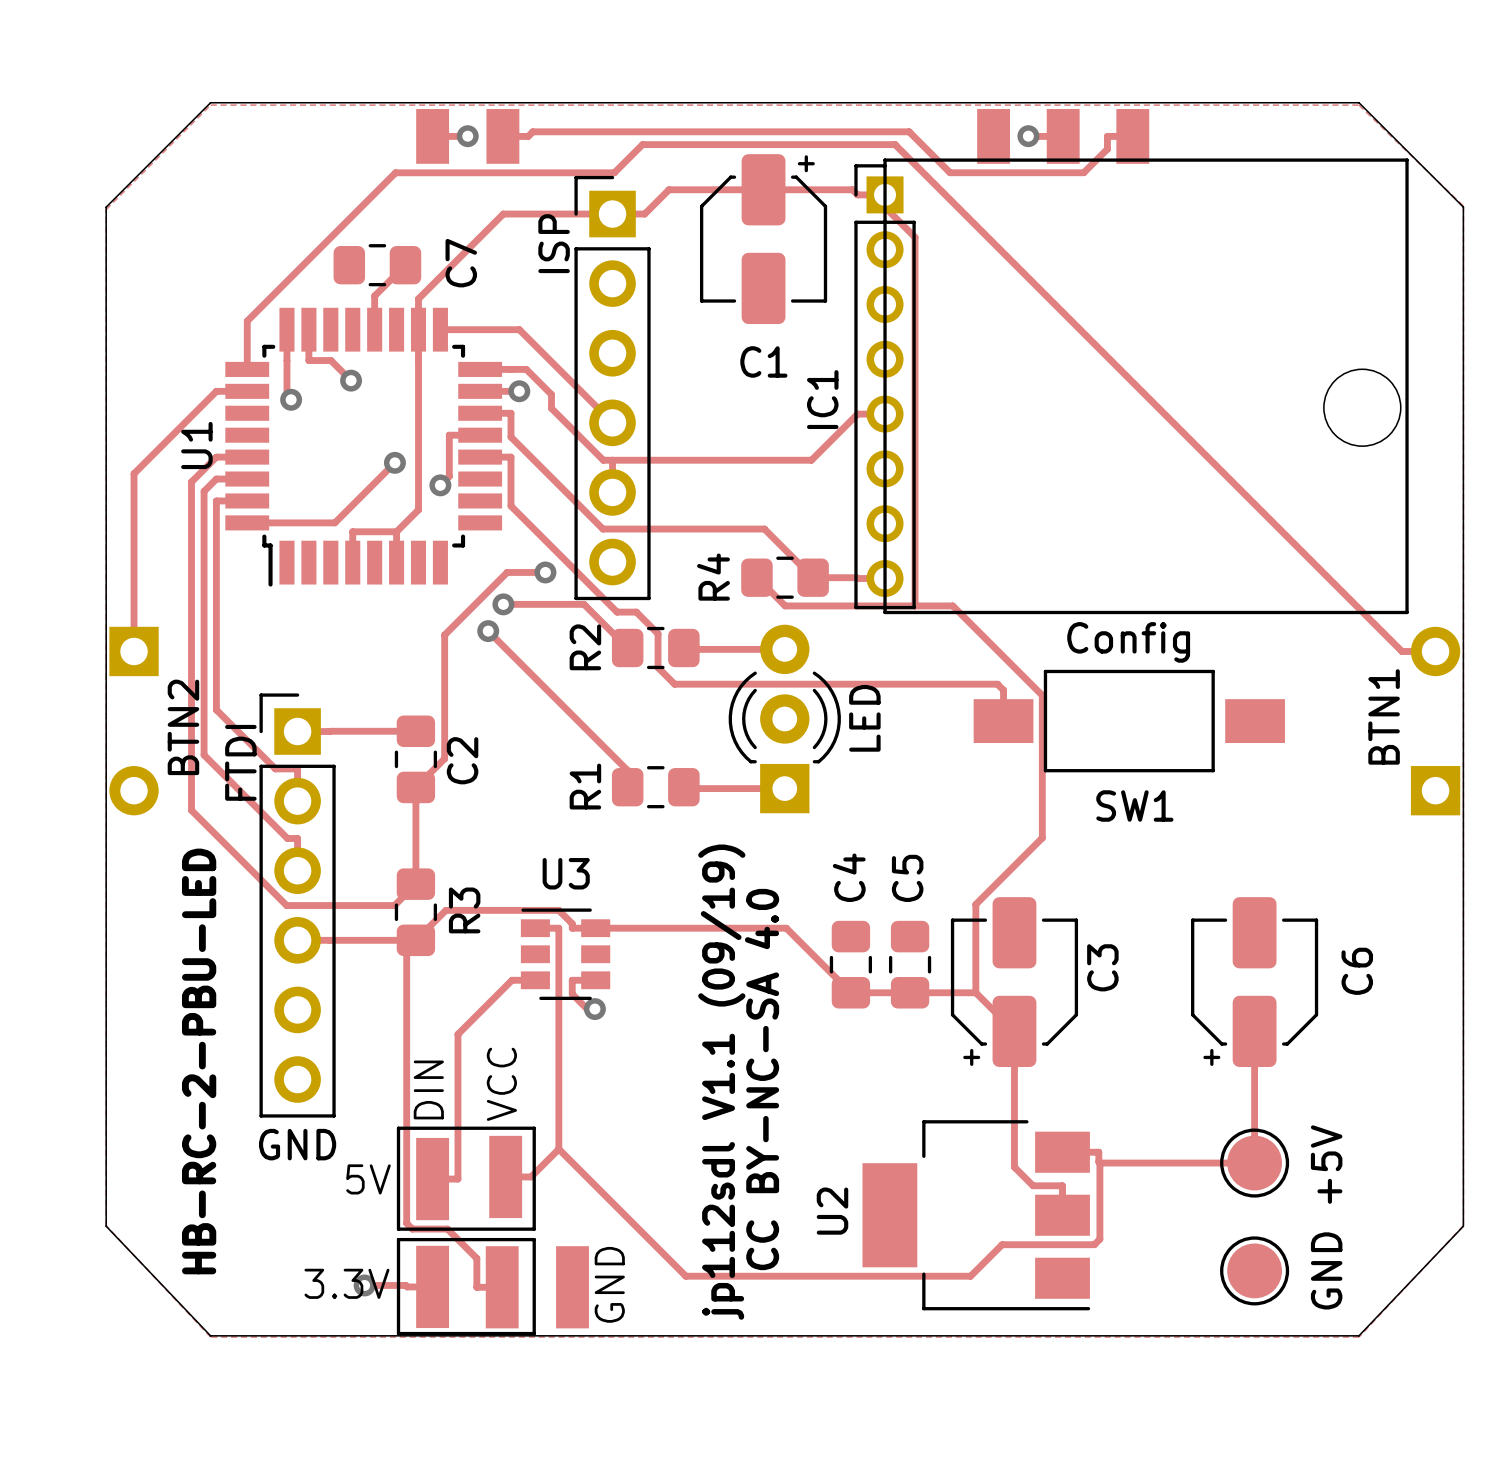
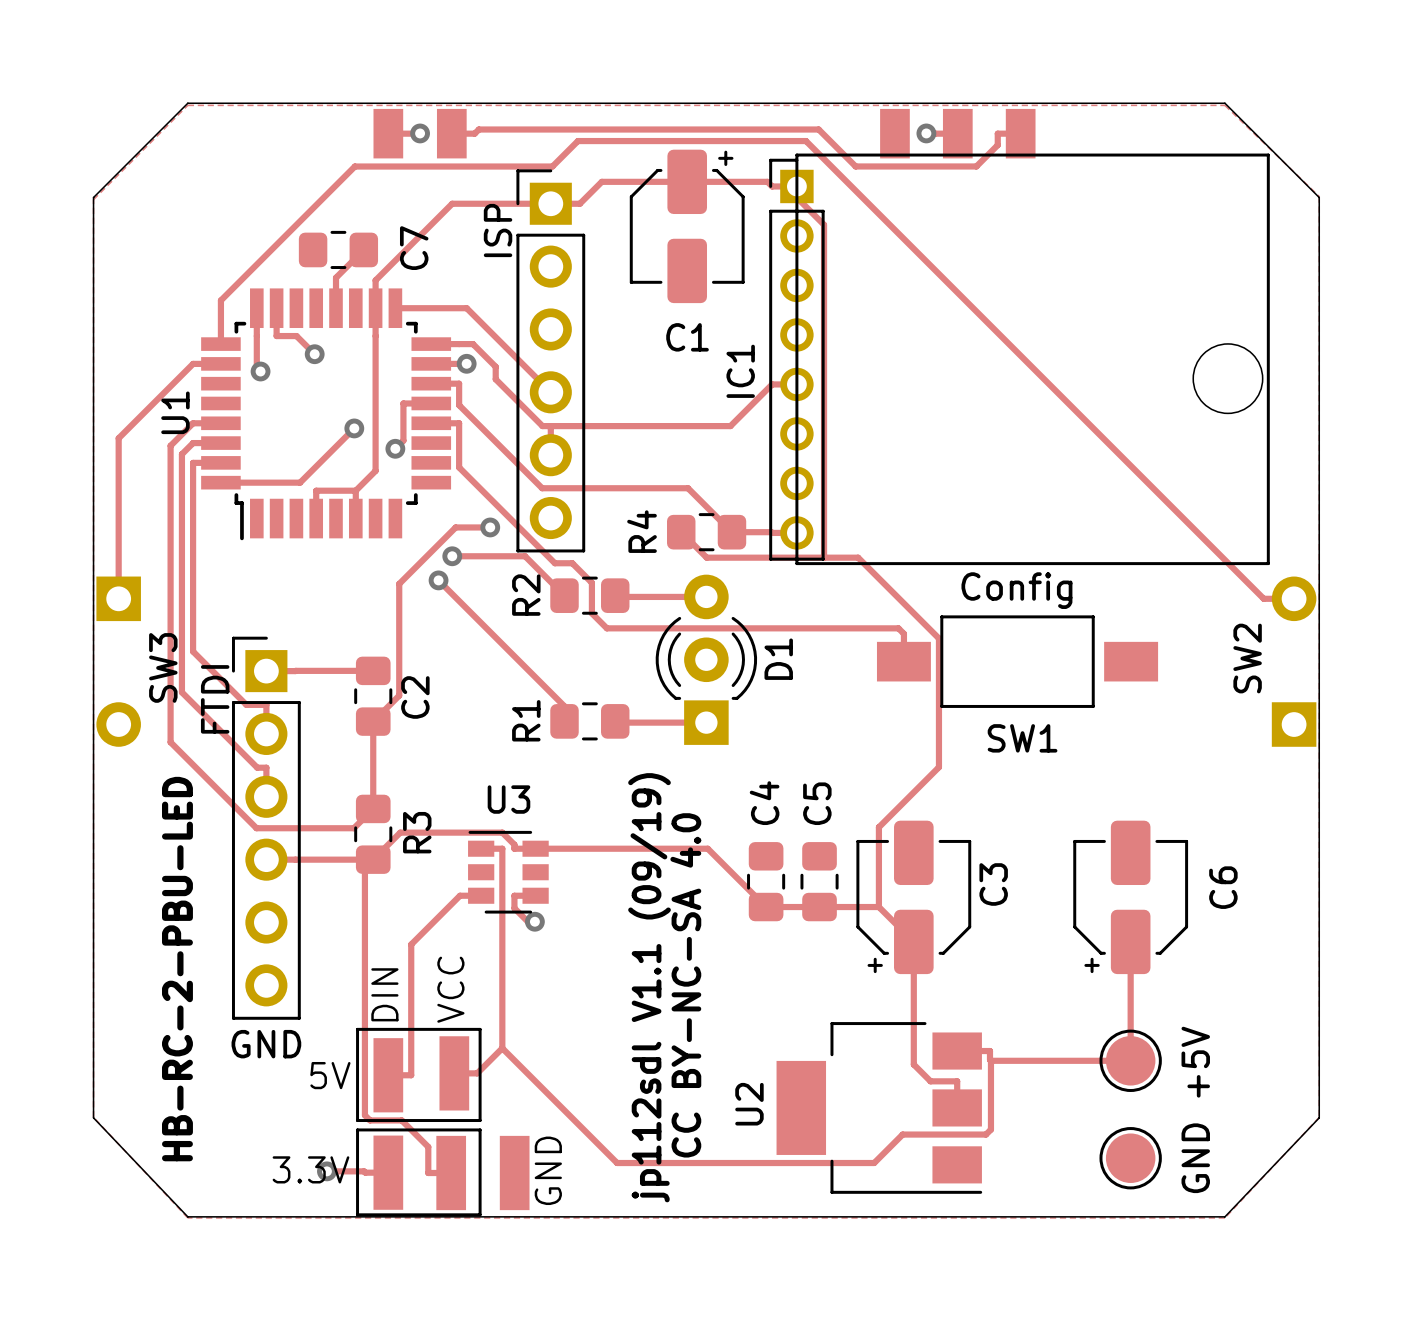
part value: BTN1 (1384, 716) -> SW2 (1247, 658)
part value: LED (864, 718) -> D1 (778, 659)
part value: BTN2 (183, 727) -> SW3 (163, 667)

